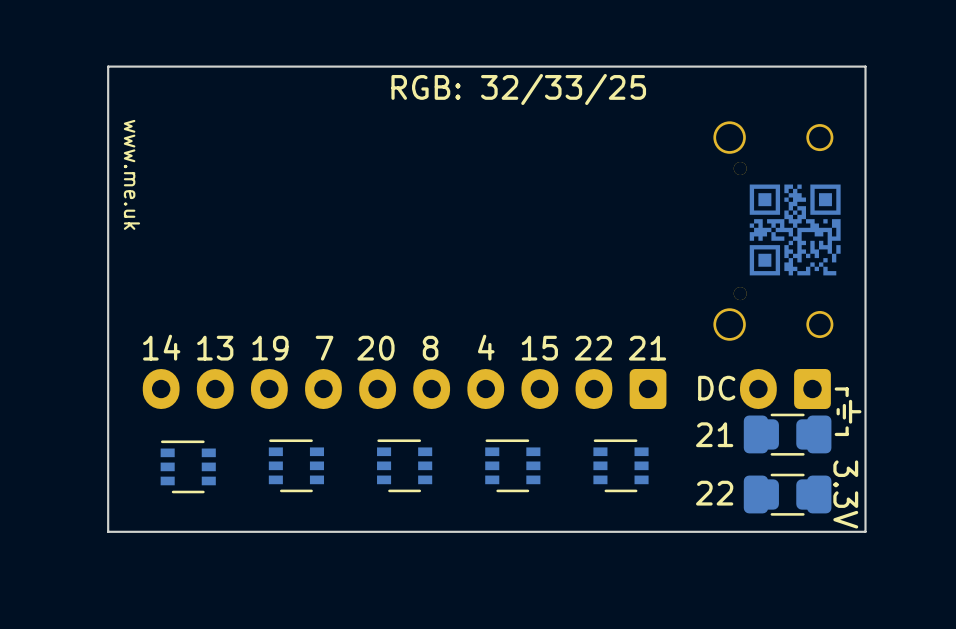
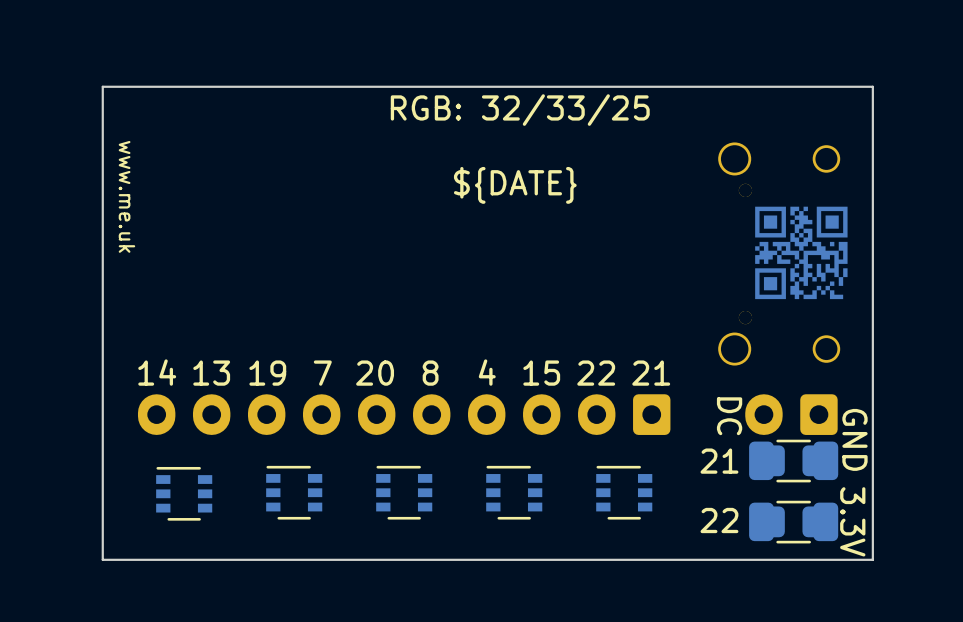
text: none -> ${DATE} (515, 185)
text rotation: 0° (716, 388) -> 90° clockwise (729, 416)
line: (836, 389) (847, 389) (847, 395) -> none
text: ⏚ (849, 411) -> GND (854, 439)
line: (847, 427) (847, 434) (836, 434) -> none

